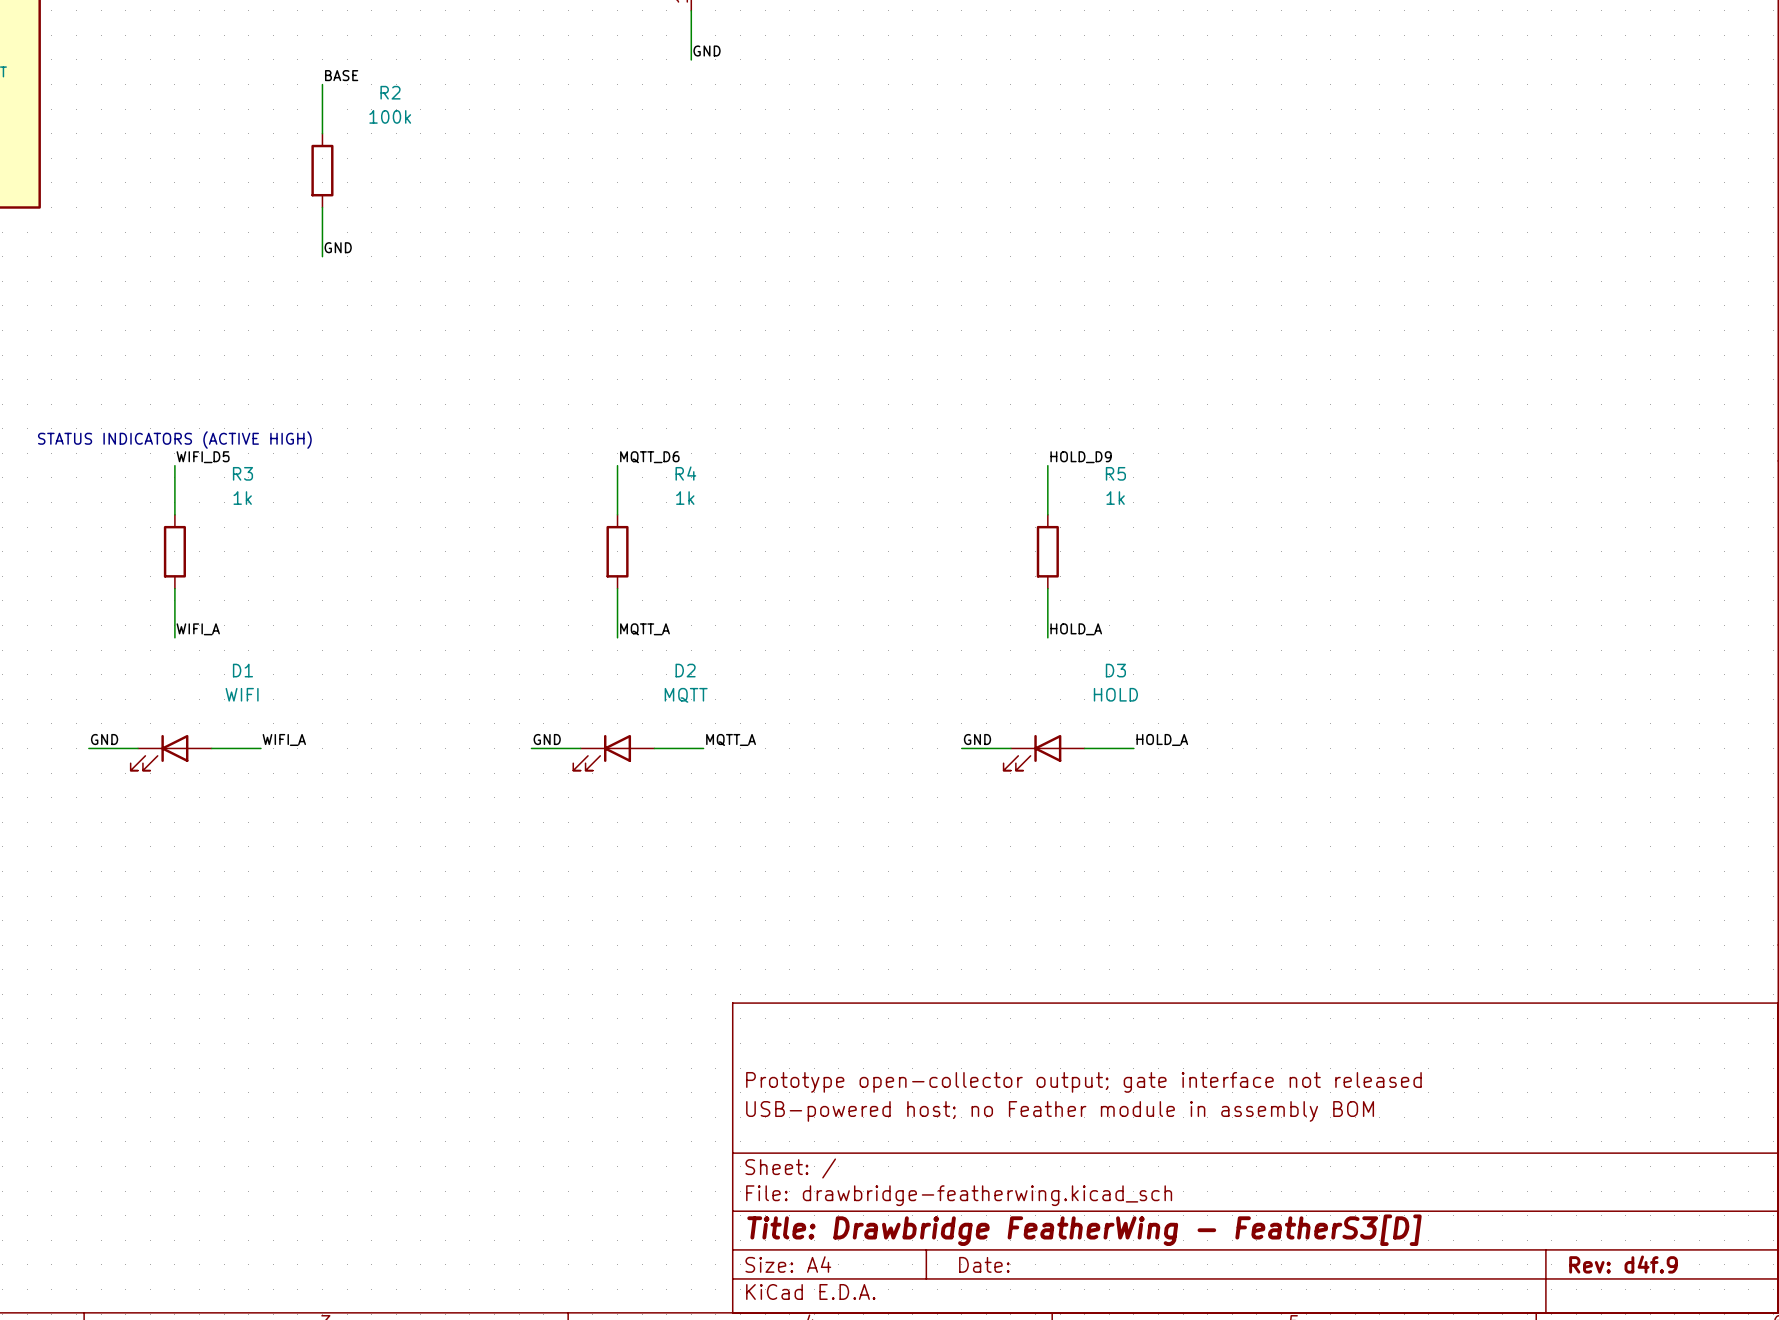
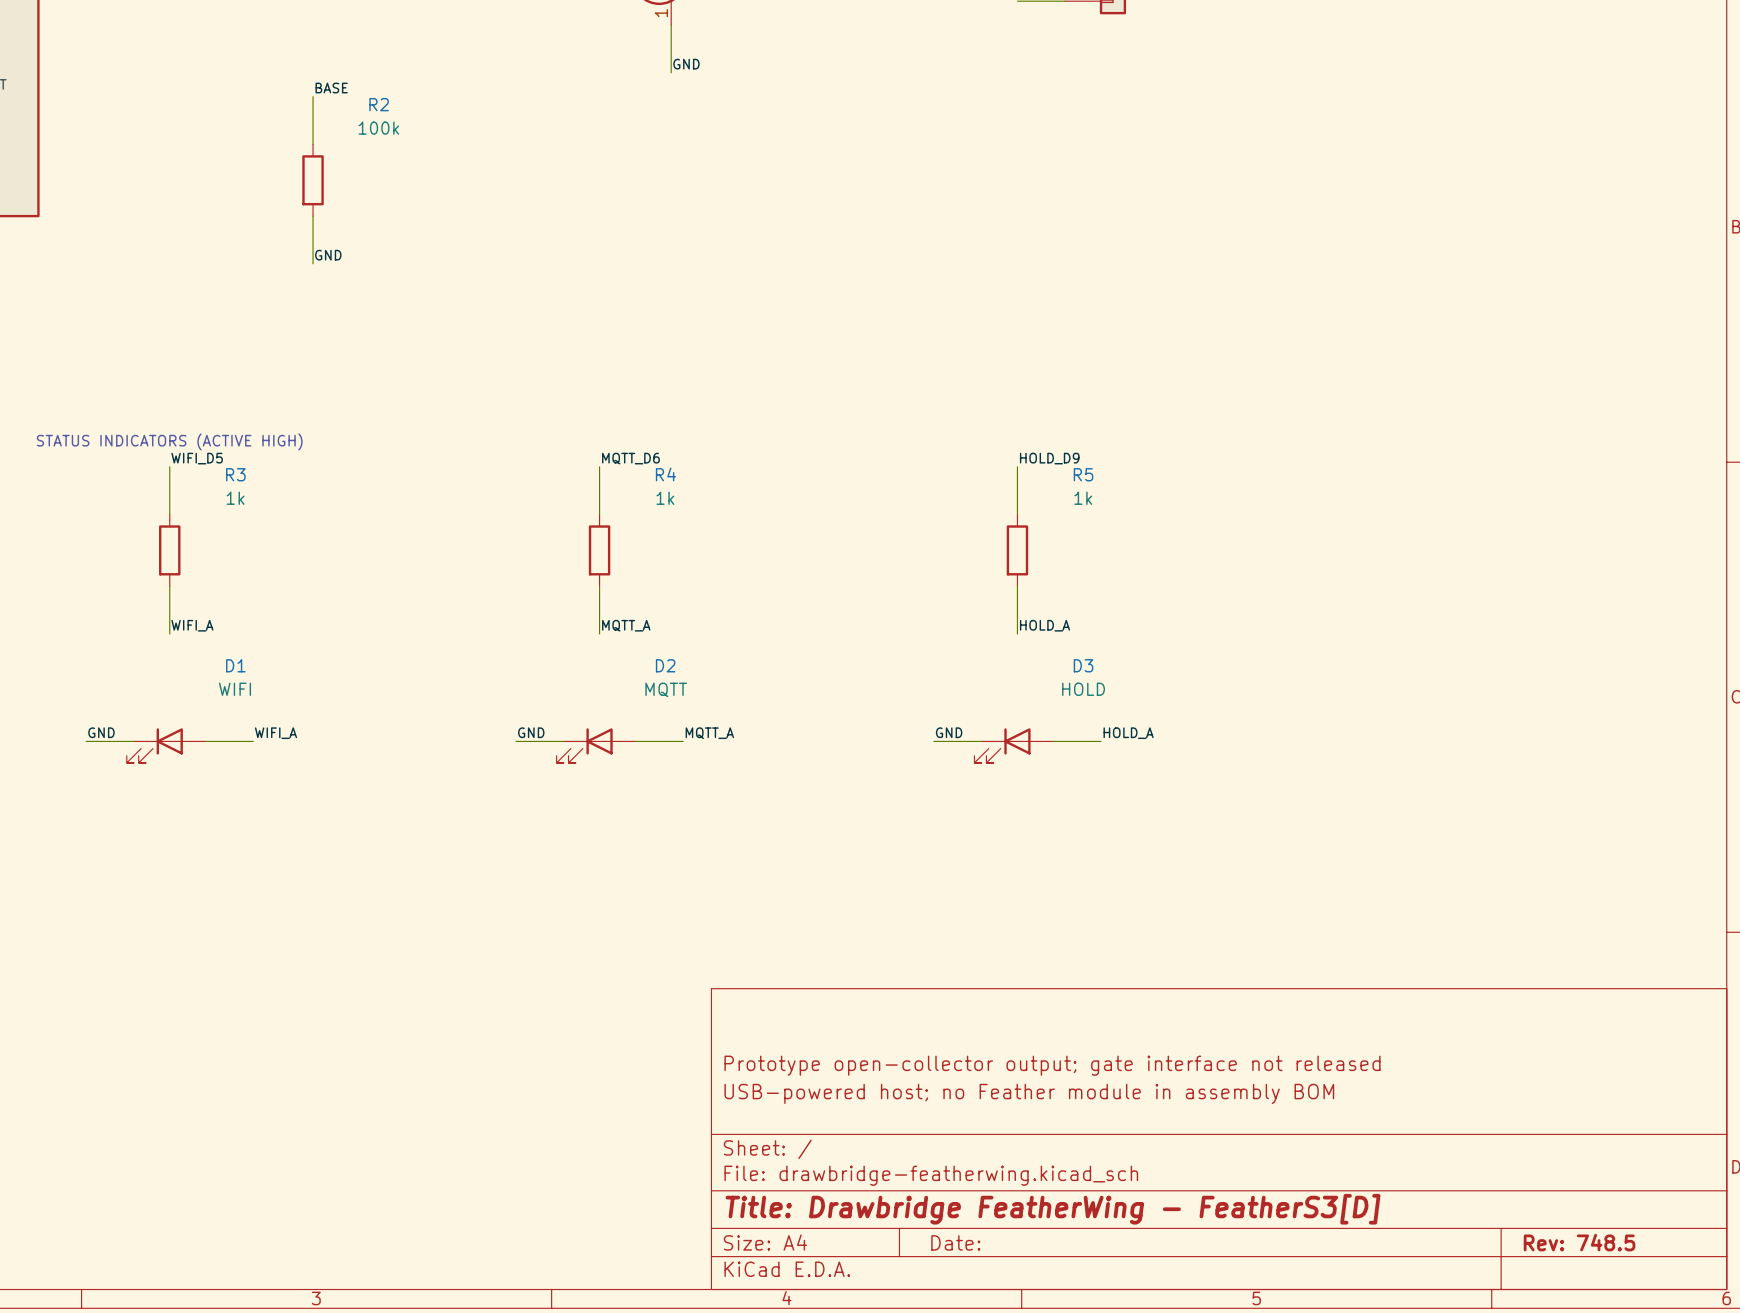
title block: Rev: d4f.9 (1623, 1264) -> Rev: 748.5 (1579, 1242)

